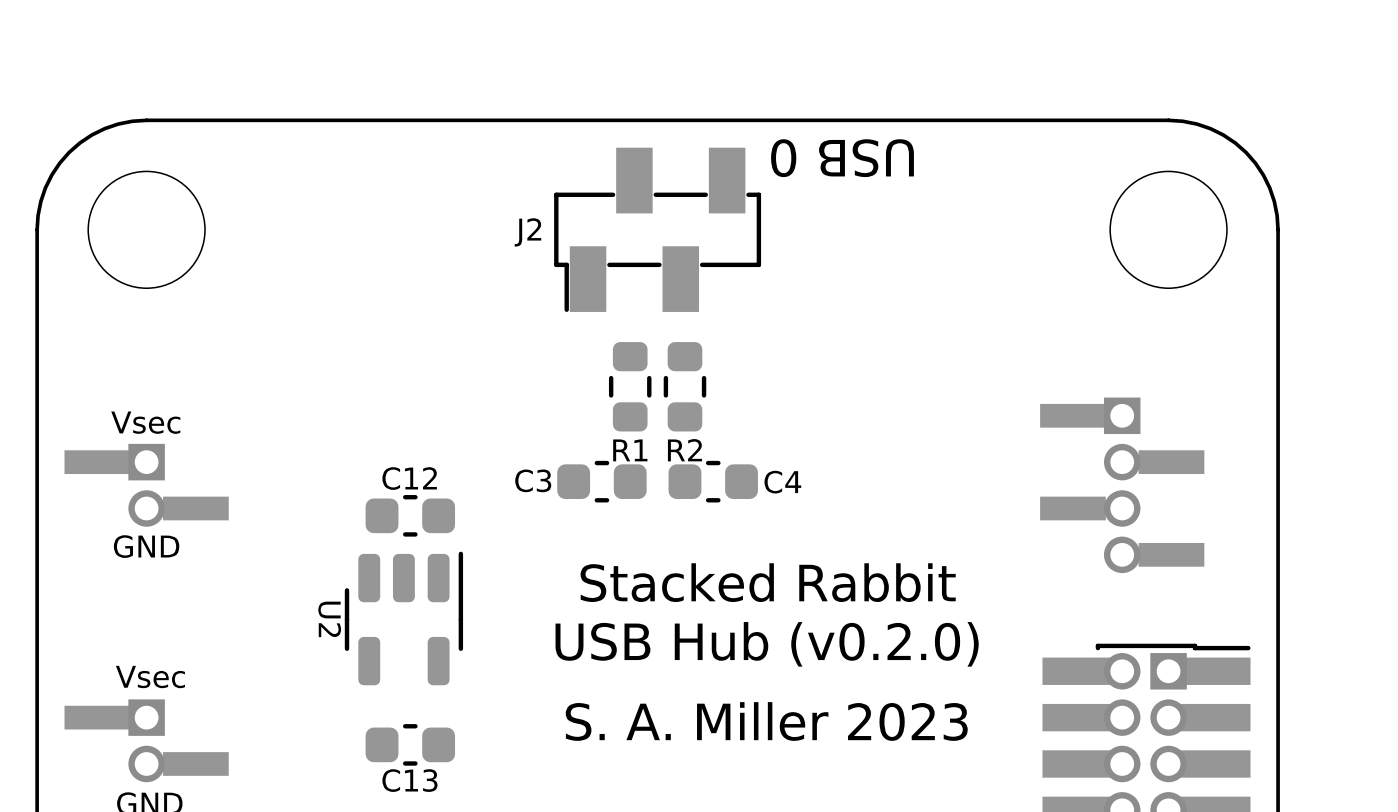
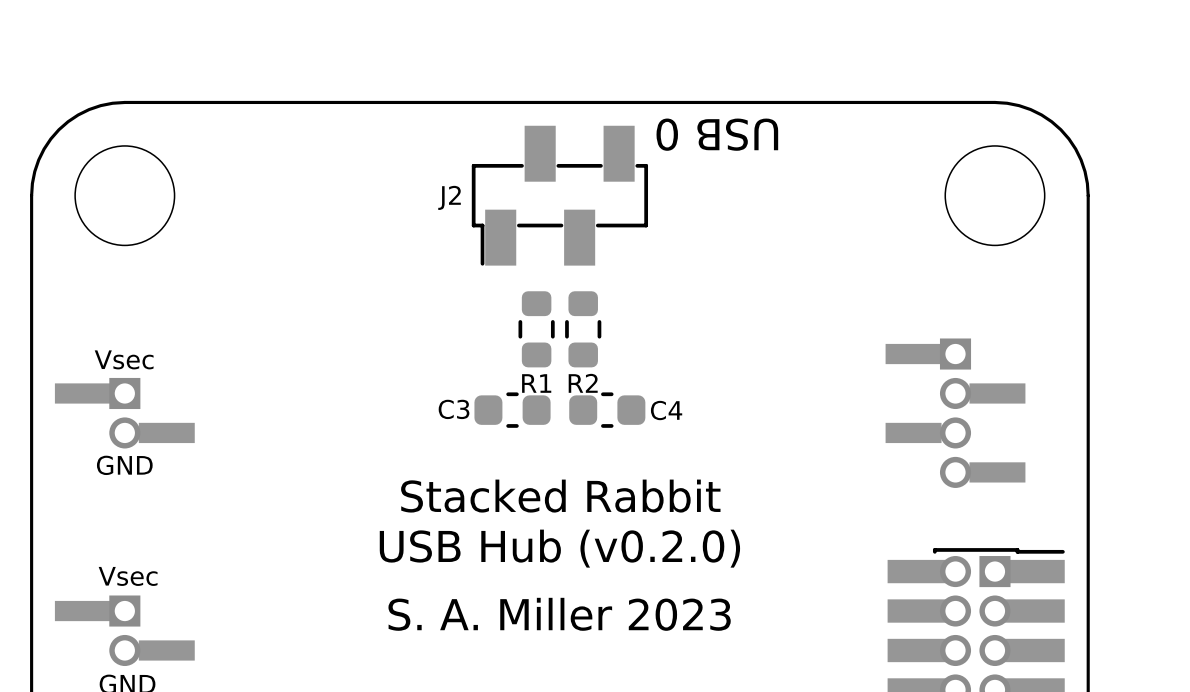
C12: (410, 515) -> none
text position: Stacked Rabbit (768, 582) -> Stacked Rabbit (560, 496)
U2: (403, 618) -> none
text position: USB Hub (v0.2.0) (767, 644) -> USB Hub (v0.2.0) (559, 548)
text position: S. A. Miller 2023 (766, 721) -> S. A. Miller 2023 (559, 614)
C13: (410, 744) -> none

